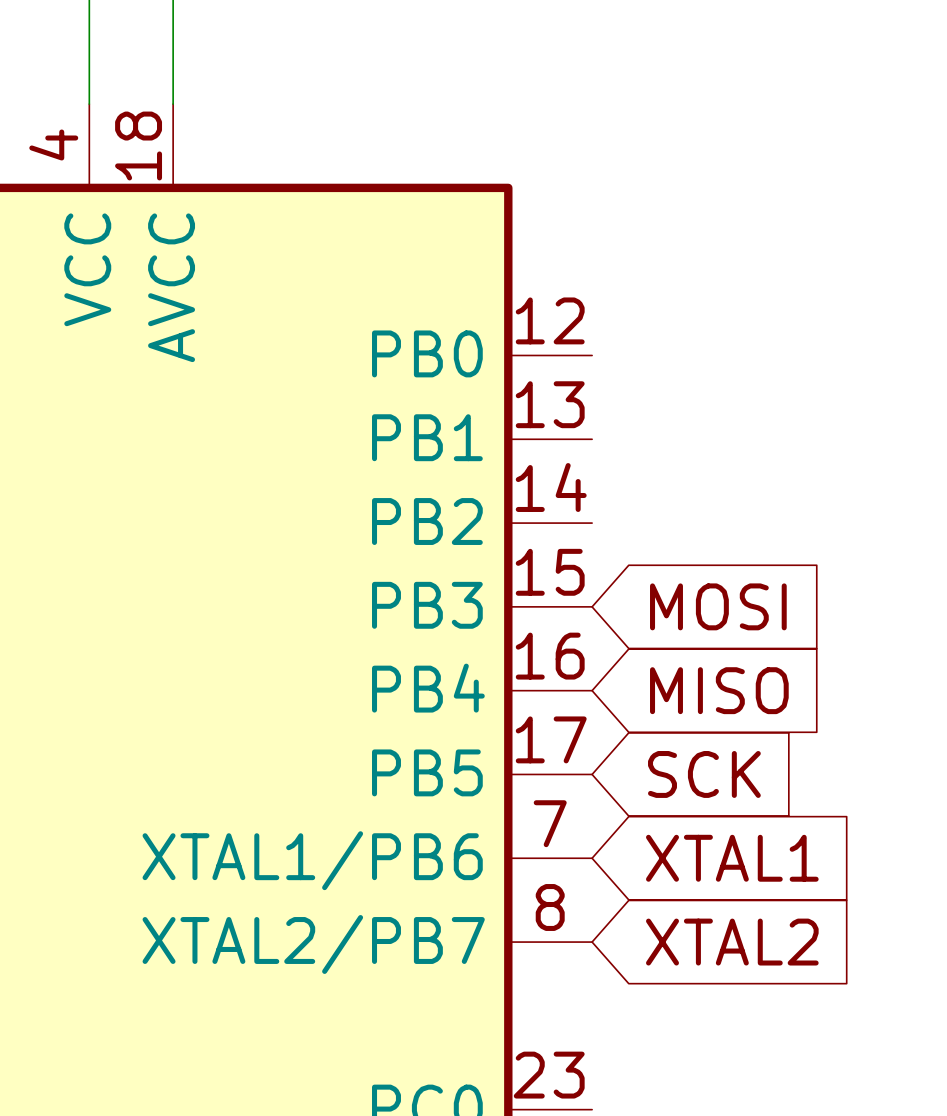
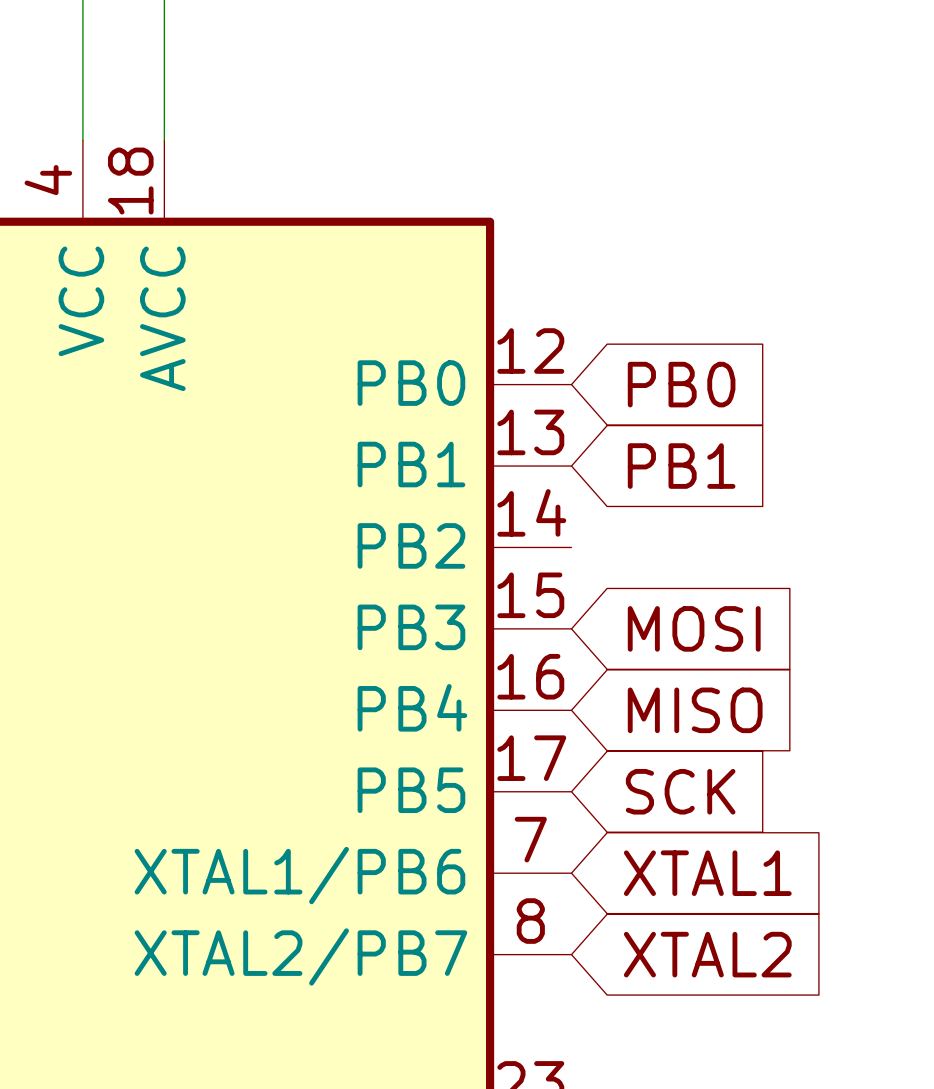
global label: none -> PB0 (681, 384)
global label: none -> PB1 (681, 466)

